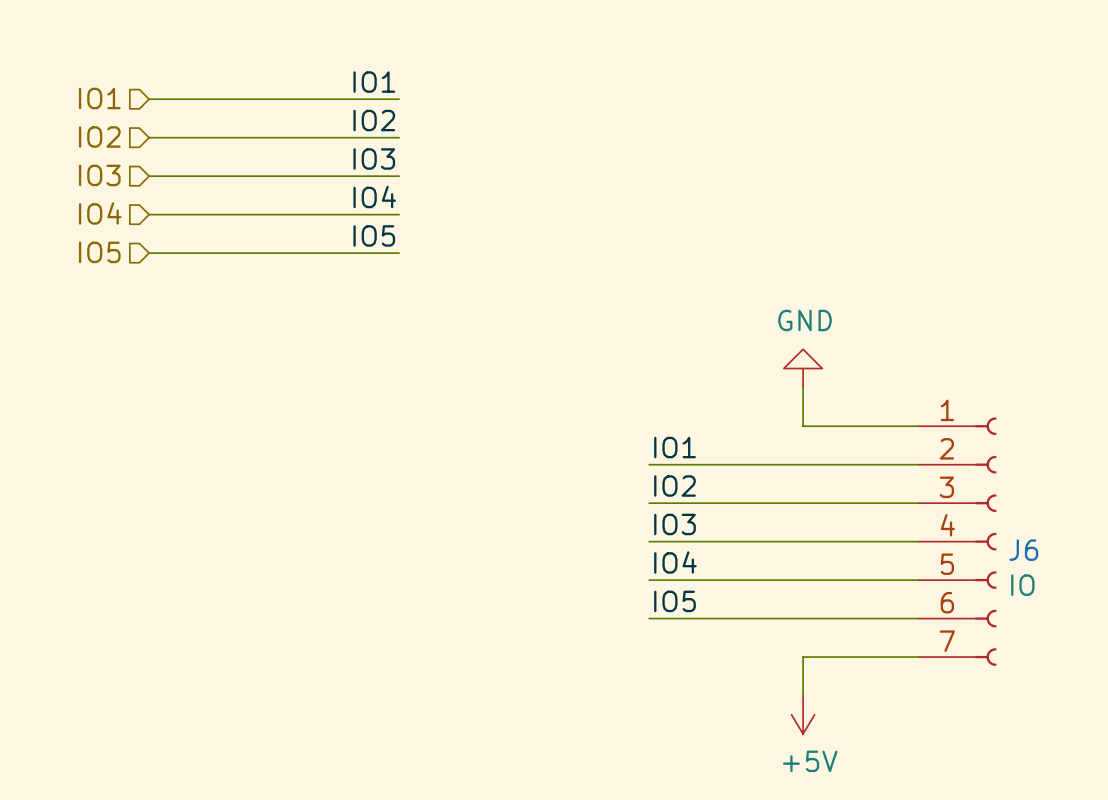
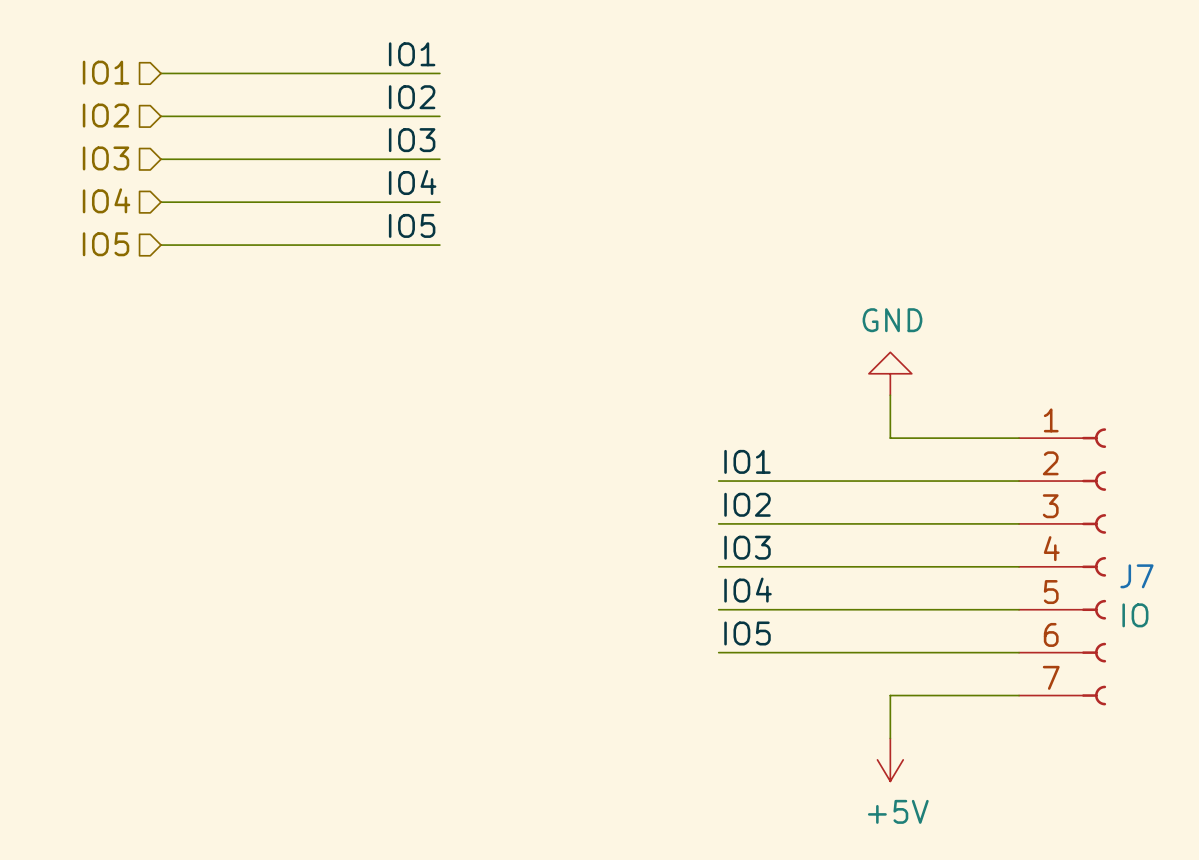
J6 name: J6 (1023, 550) -> J7 (1136, 576)

